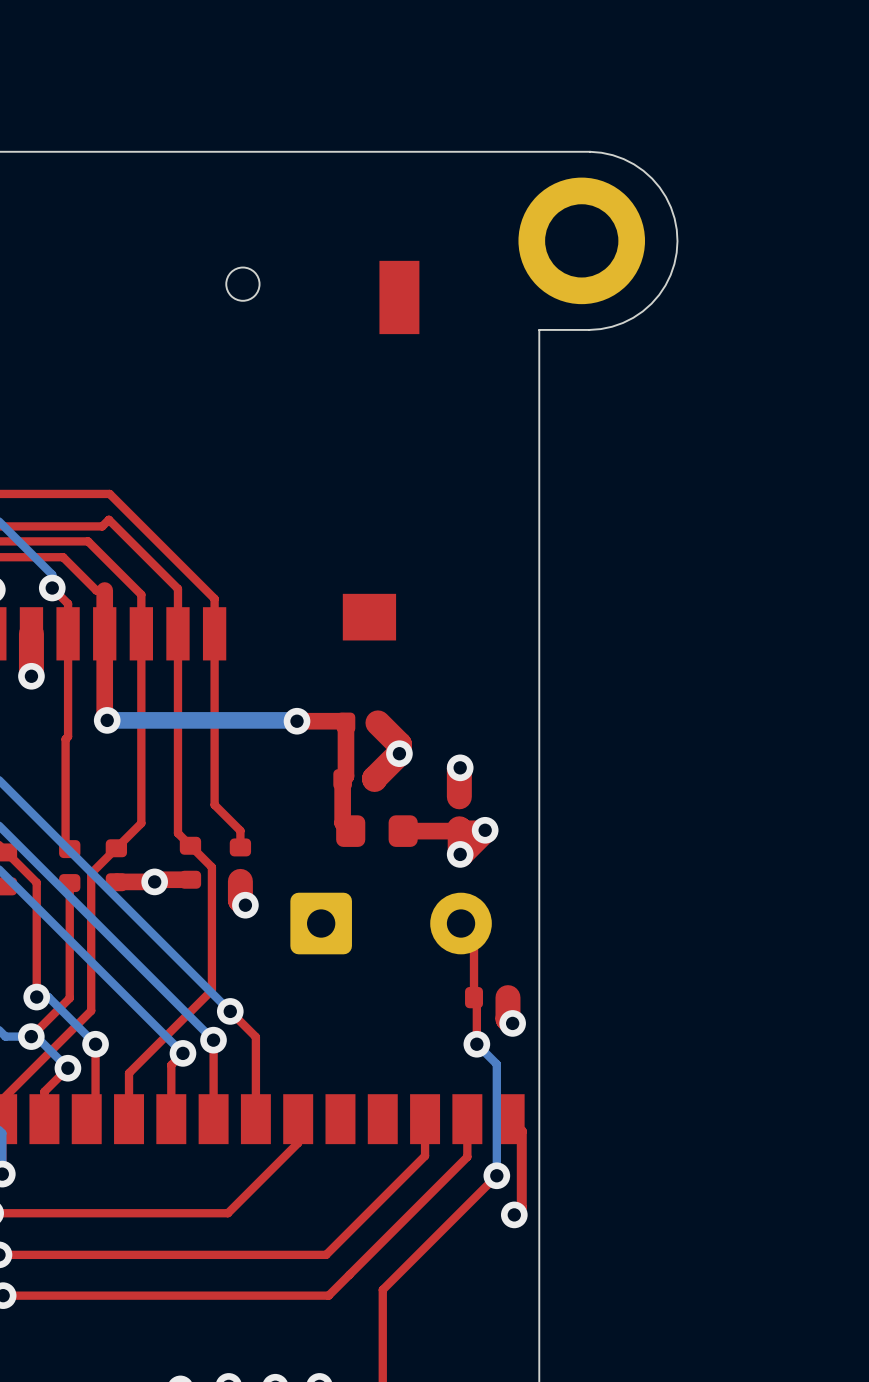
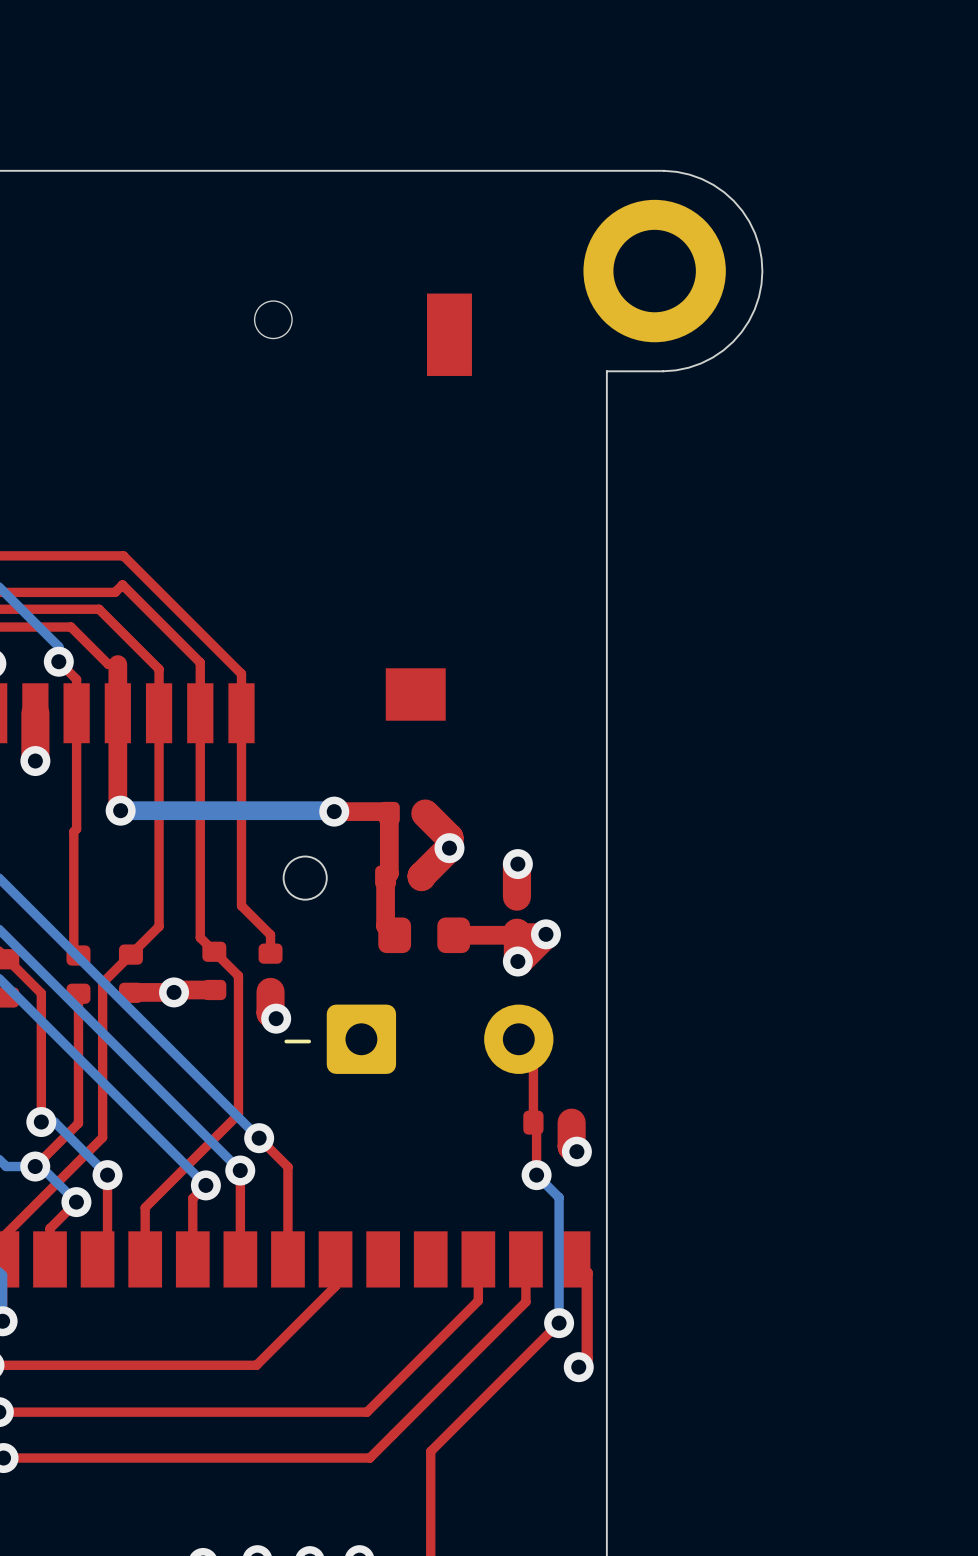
round board edge: none -> [282, 855, 328, 901]
text: none -> - (297, 1041)

